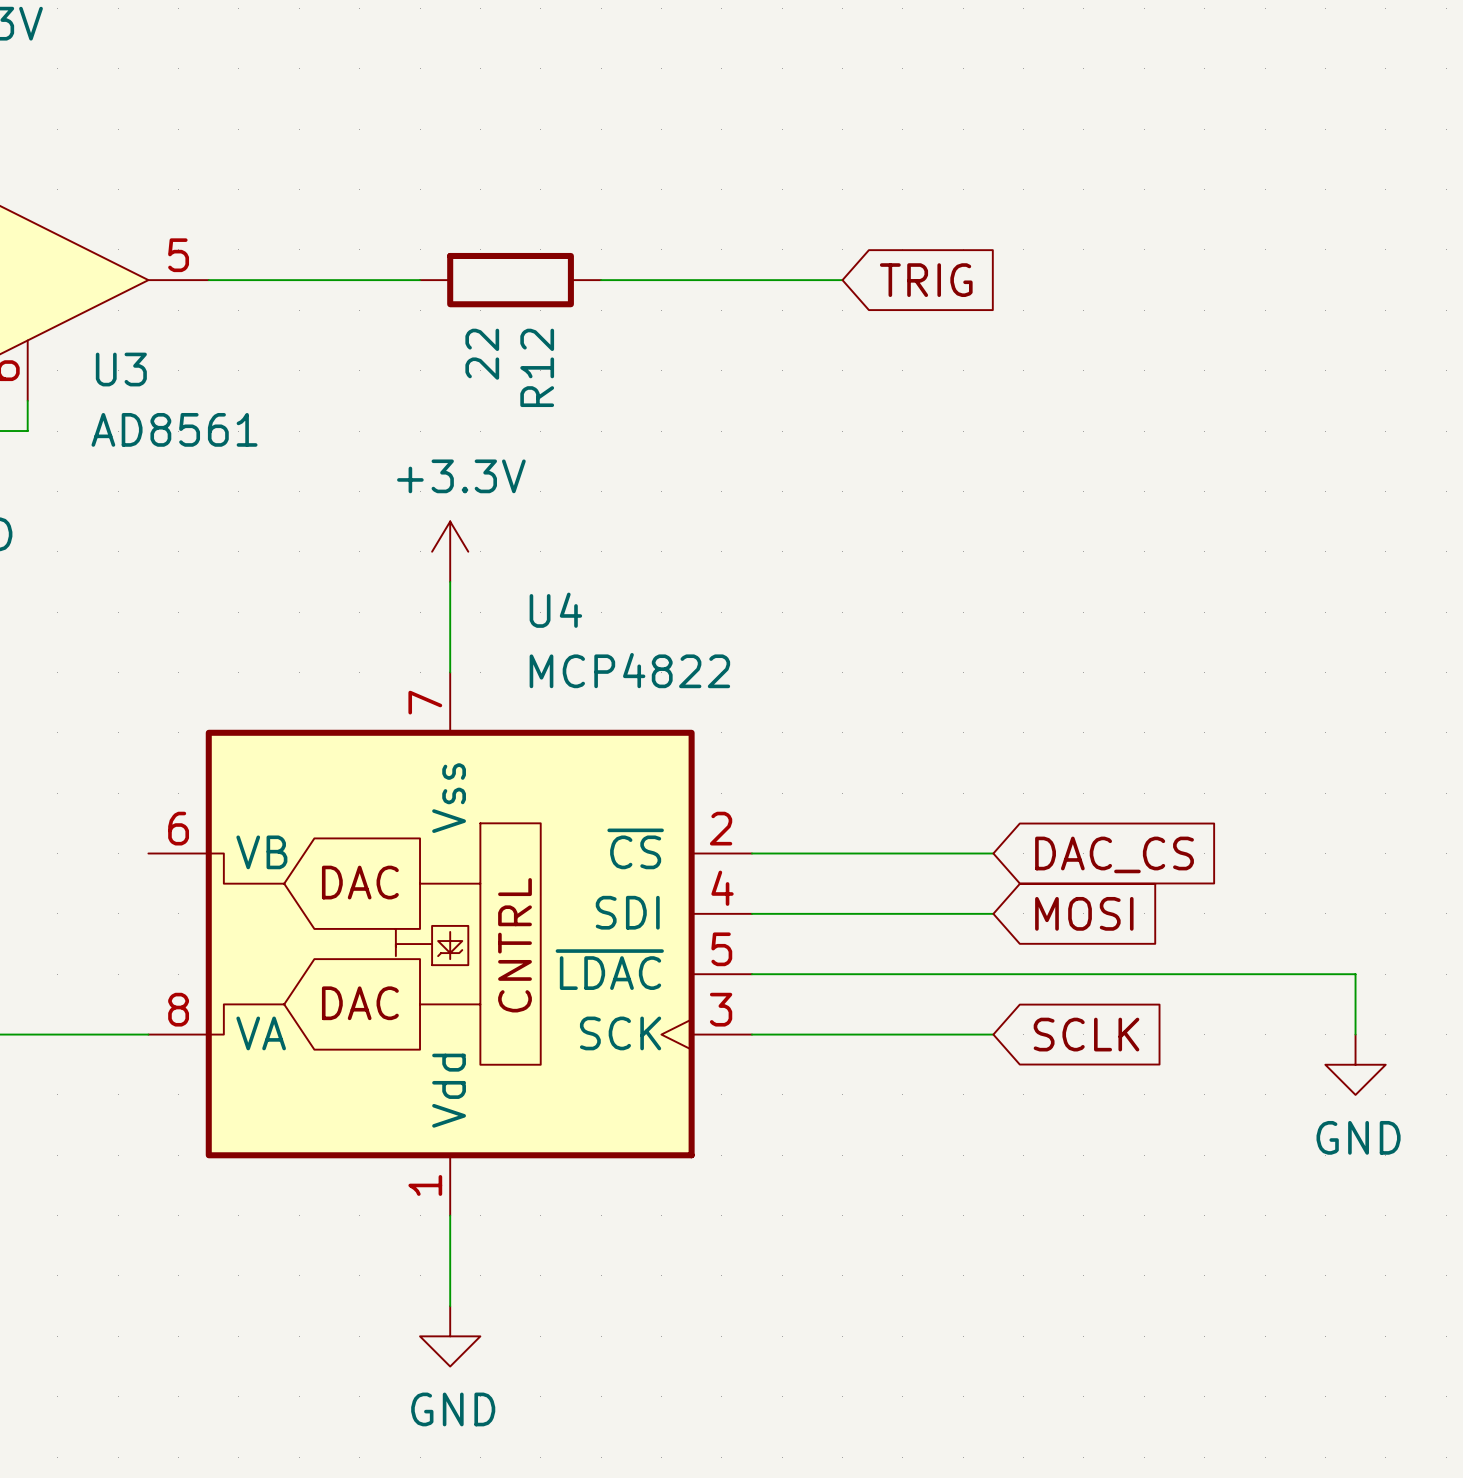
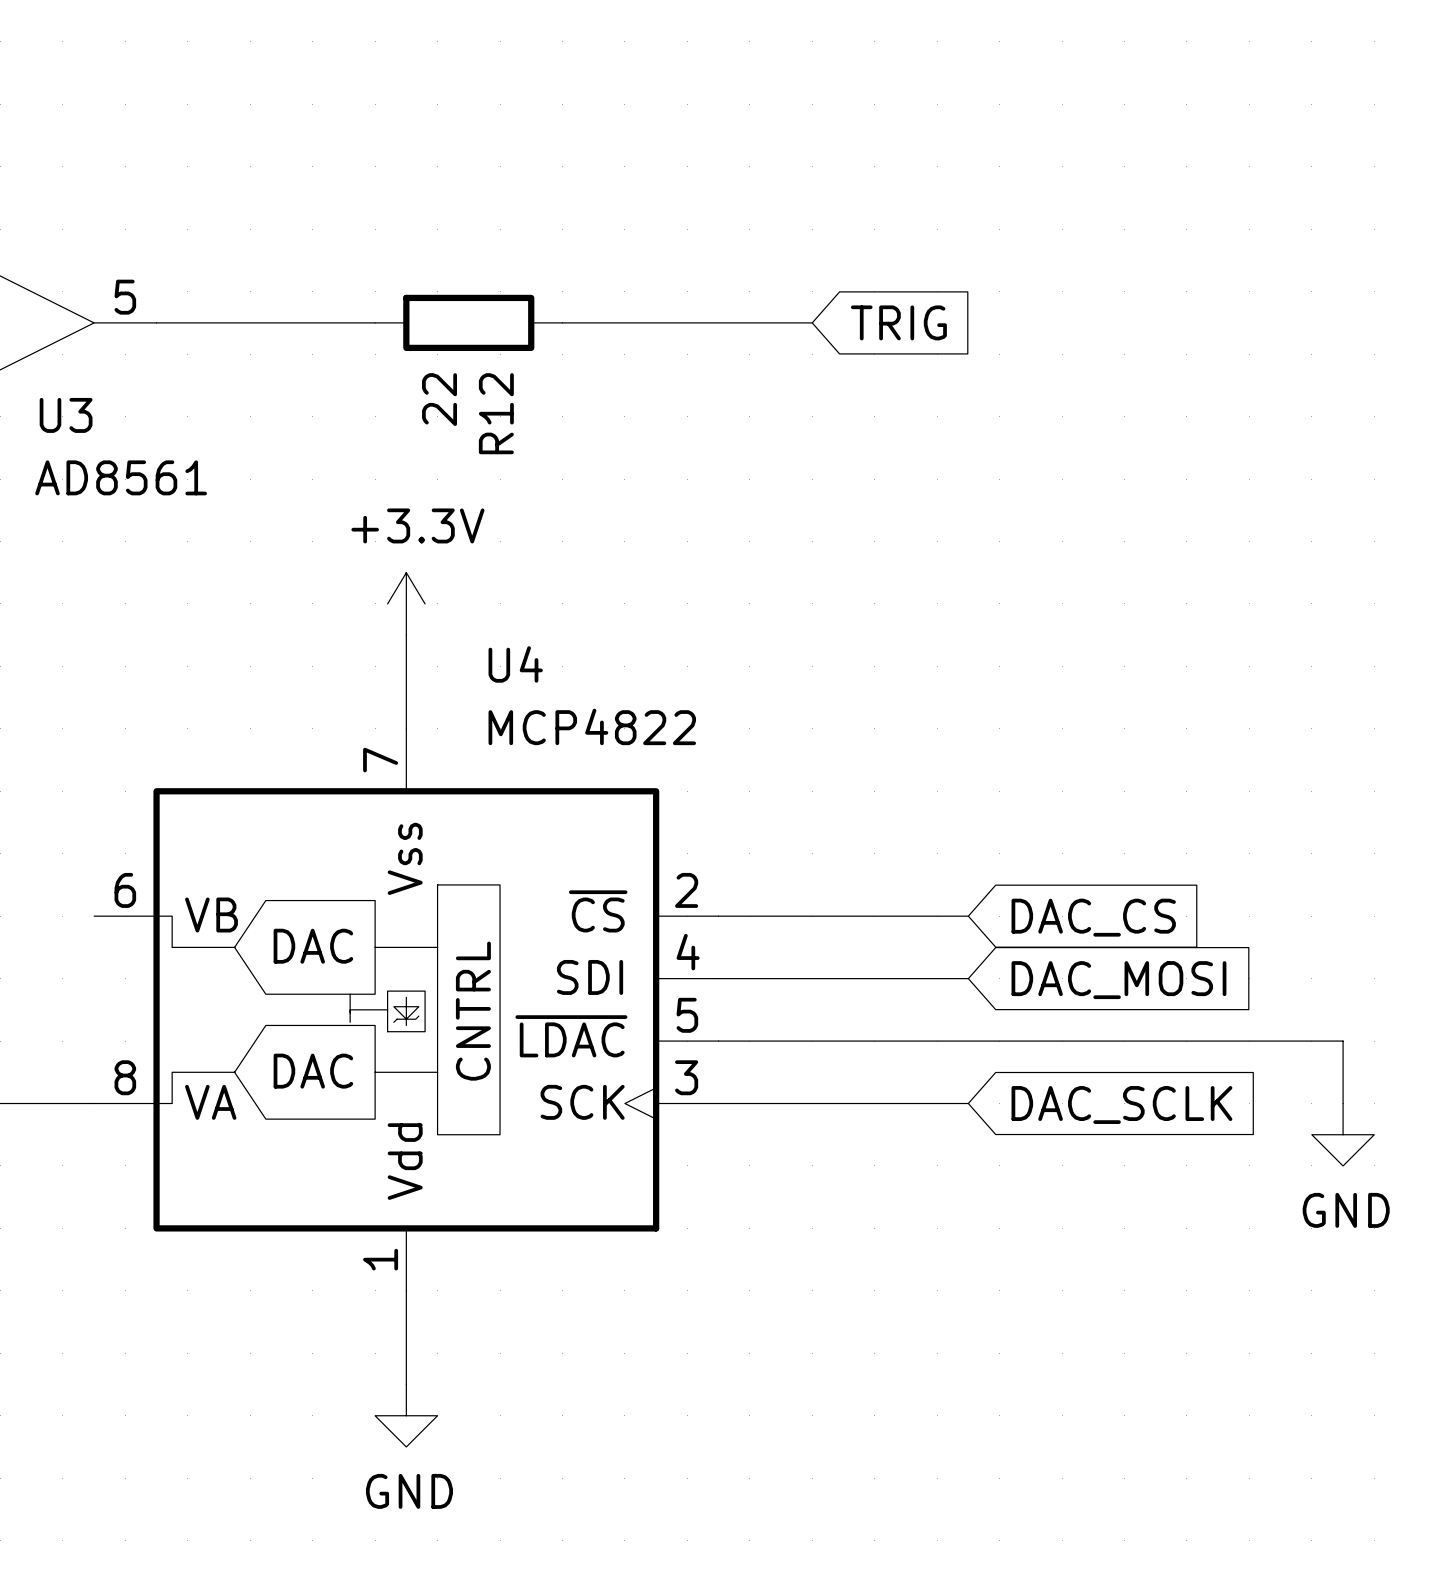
global label: MOSI (1084, 913) -> DAC_MOSI (1118, 980)
global label: SCLK (1086, 1034) -> DAC_SCLK (1121, 1105)

